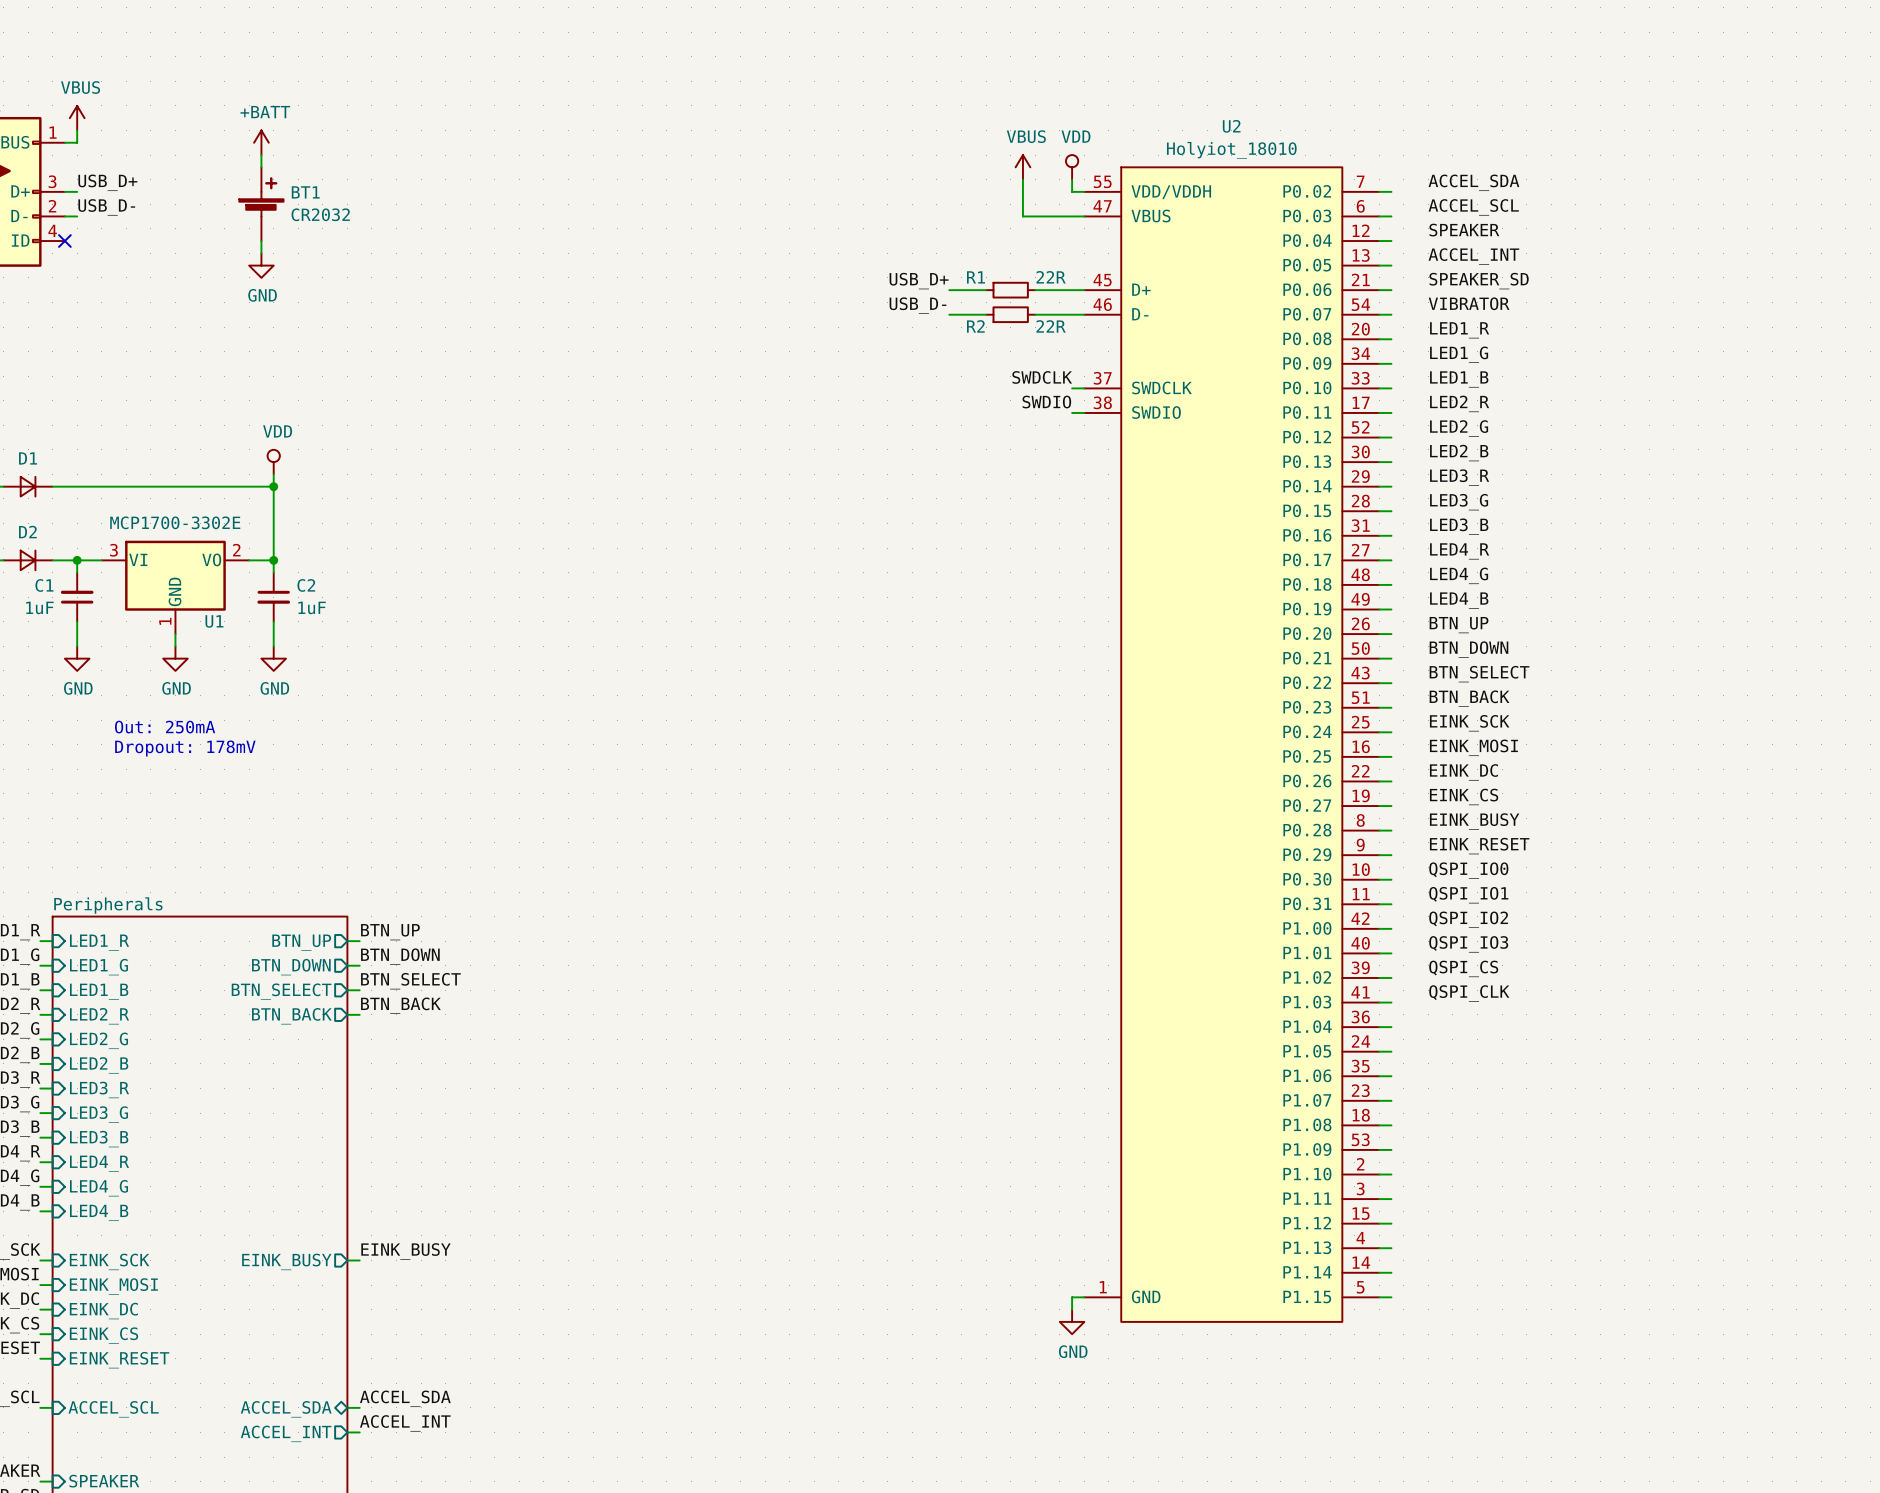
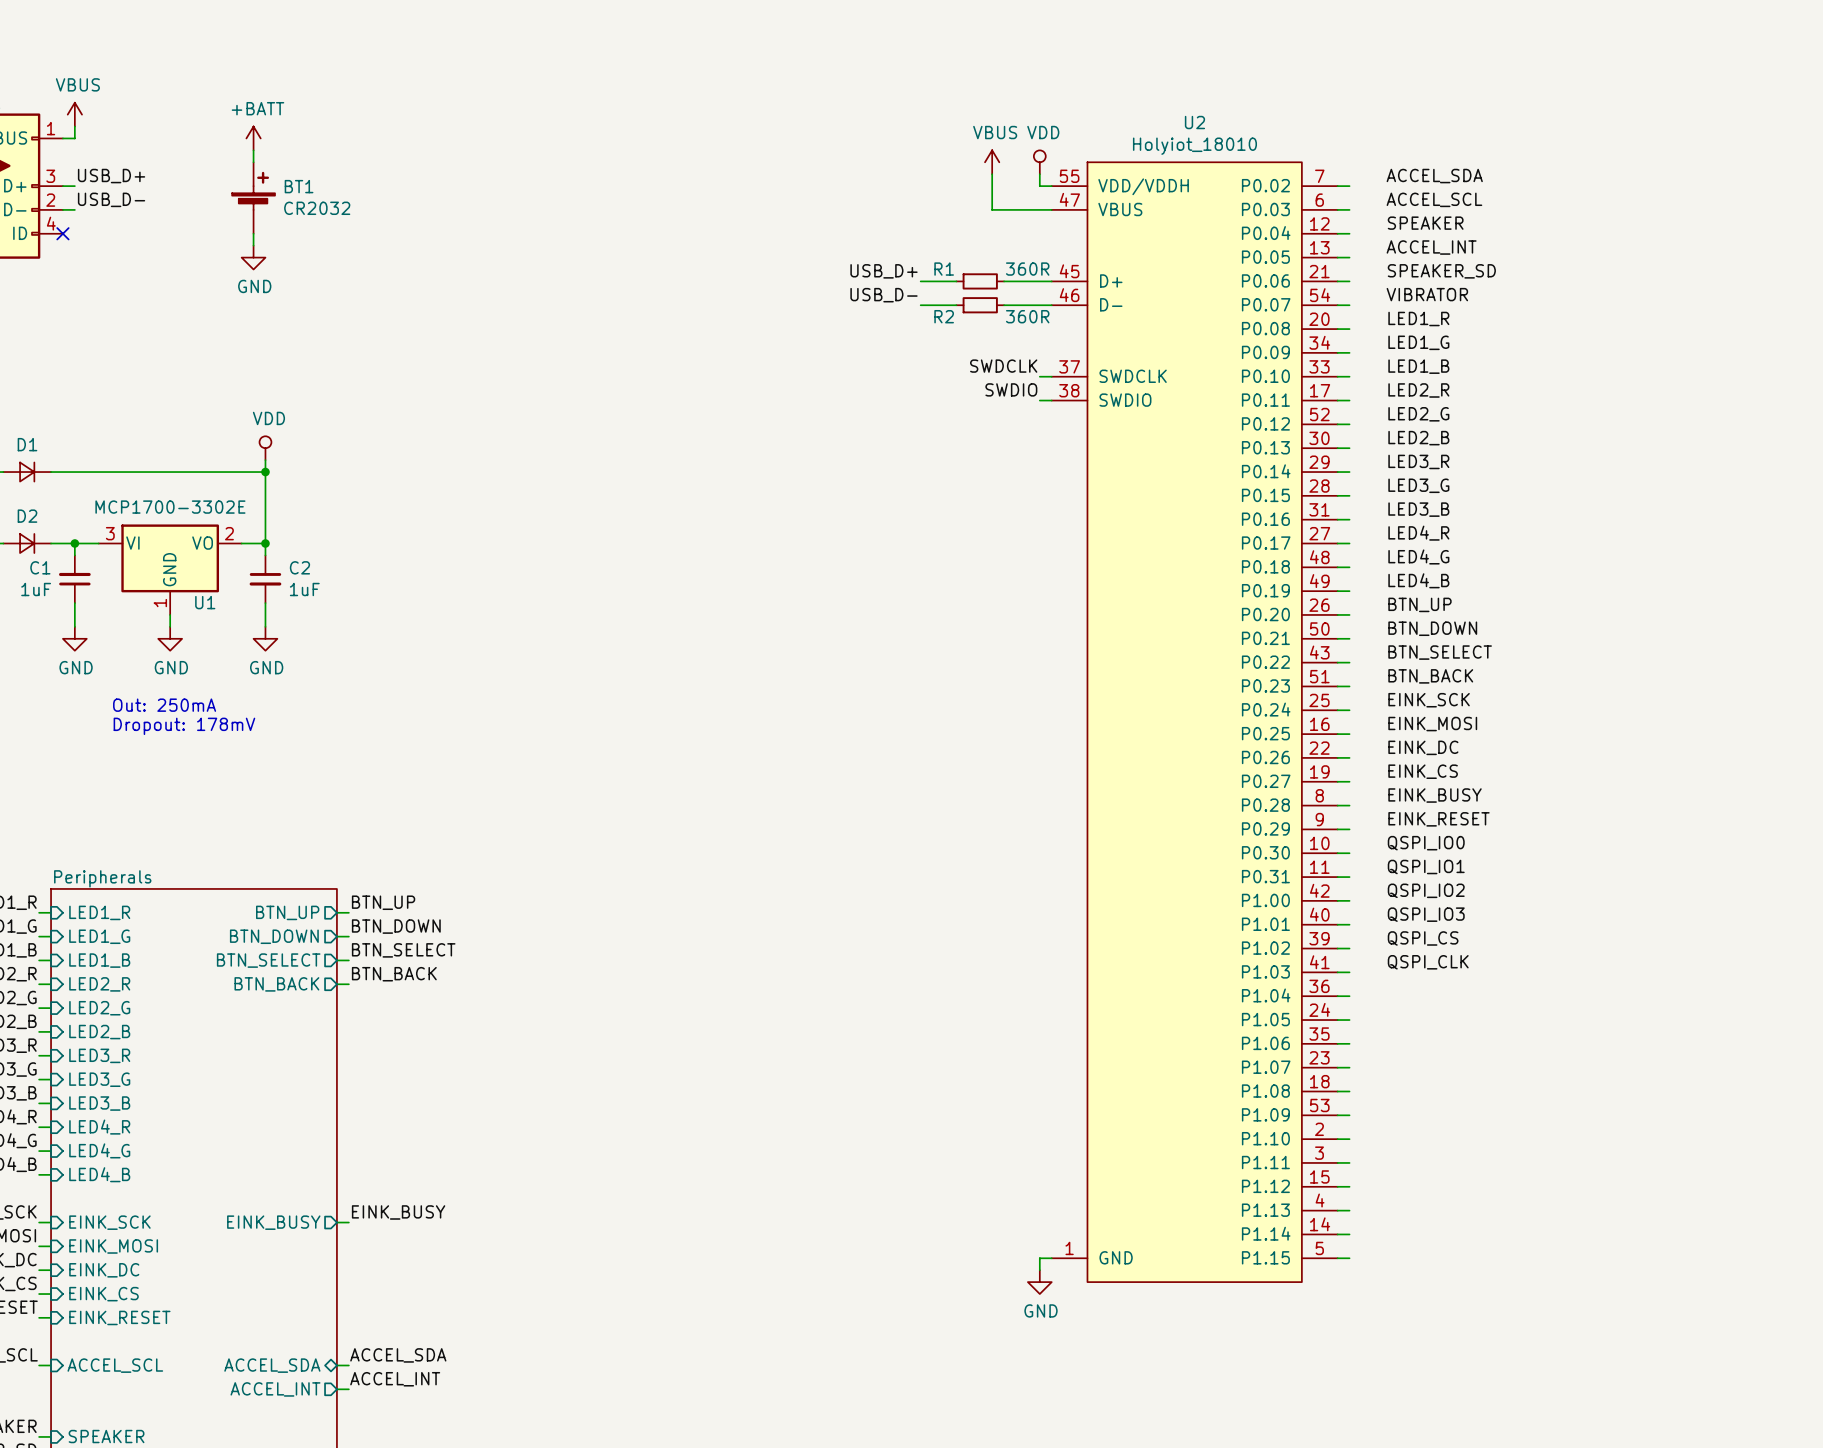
R1 value: 22R (1051, 277) -> 360R (1027, 269)
R2 value: 22R (1051, 326) -> 360R (1027, 316)

